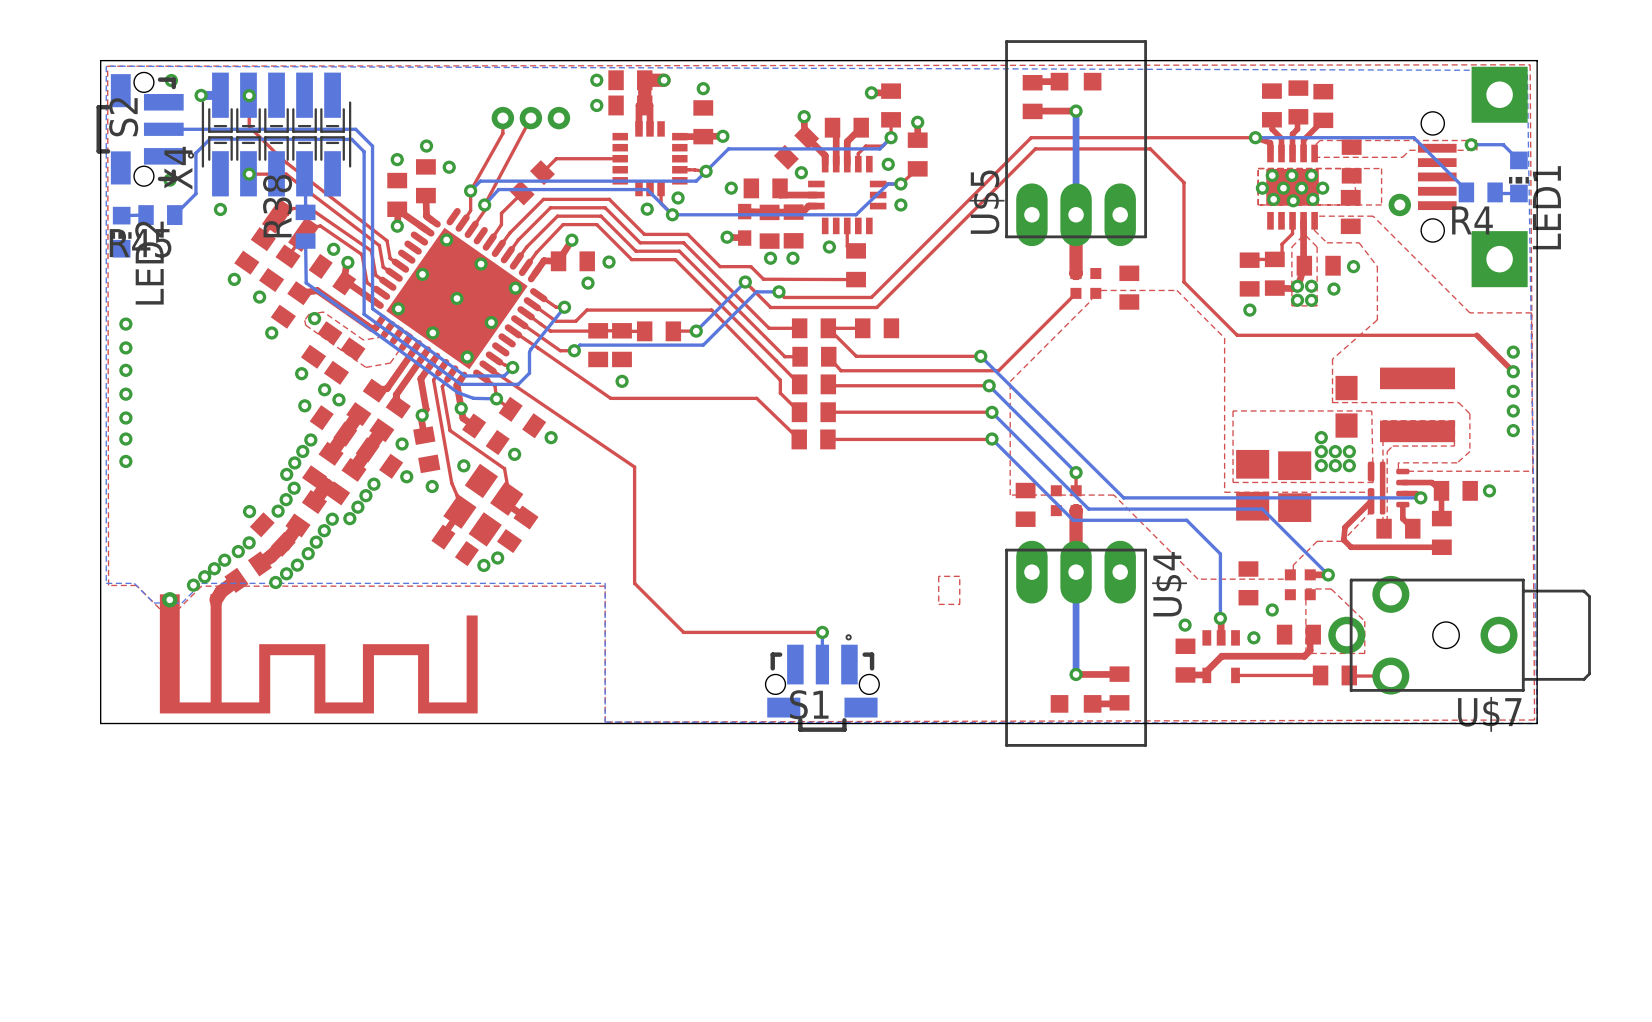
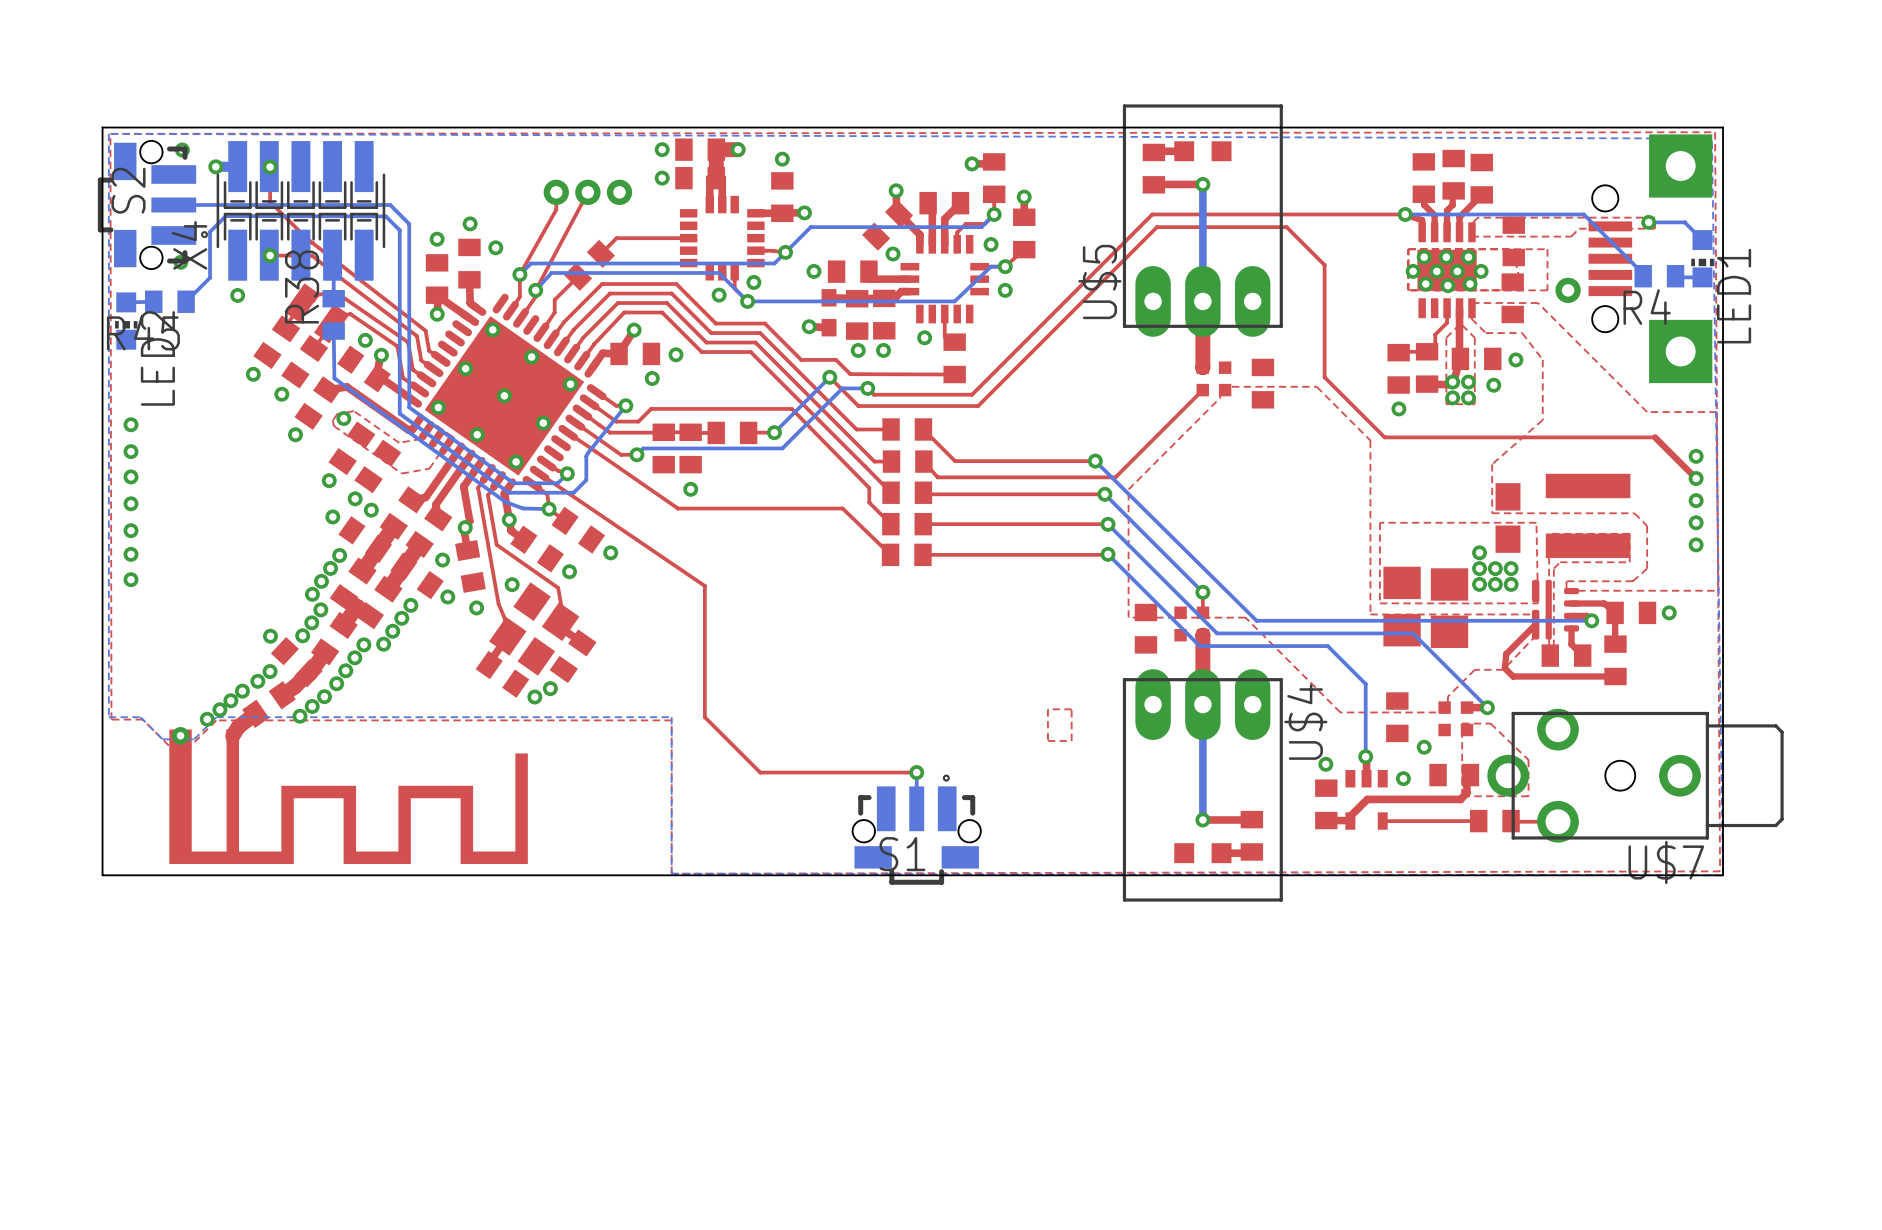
top track: (862, 328) (828, 328) -> none
part: (877, 328) -> none

